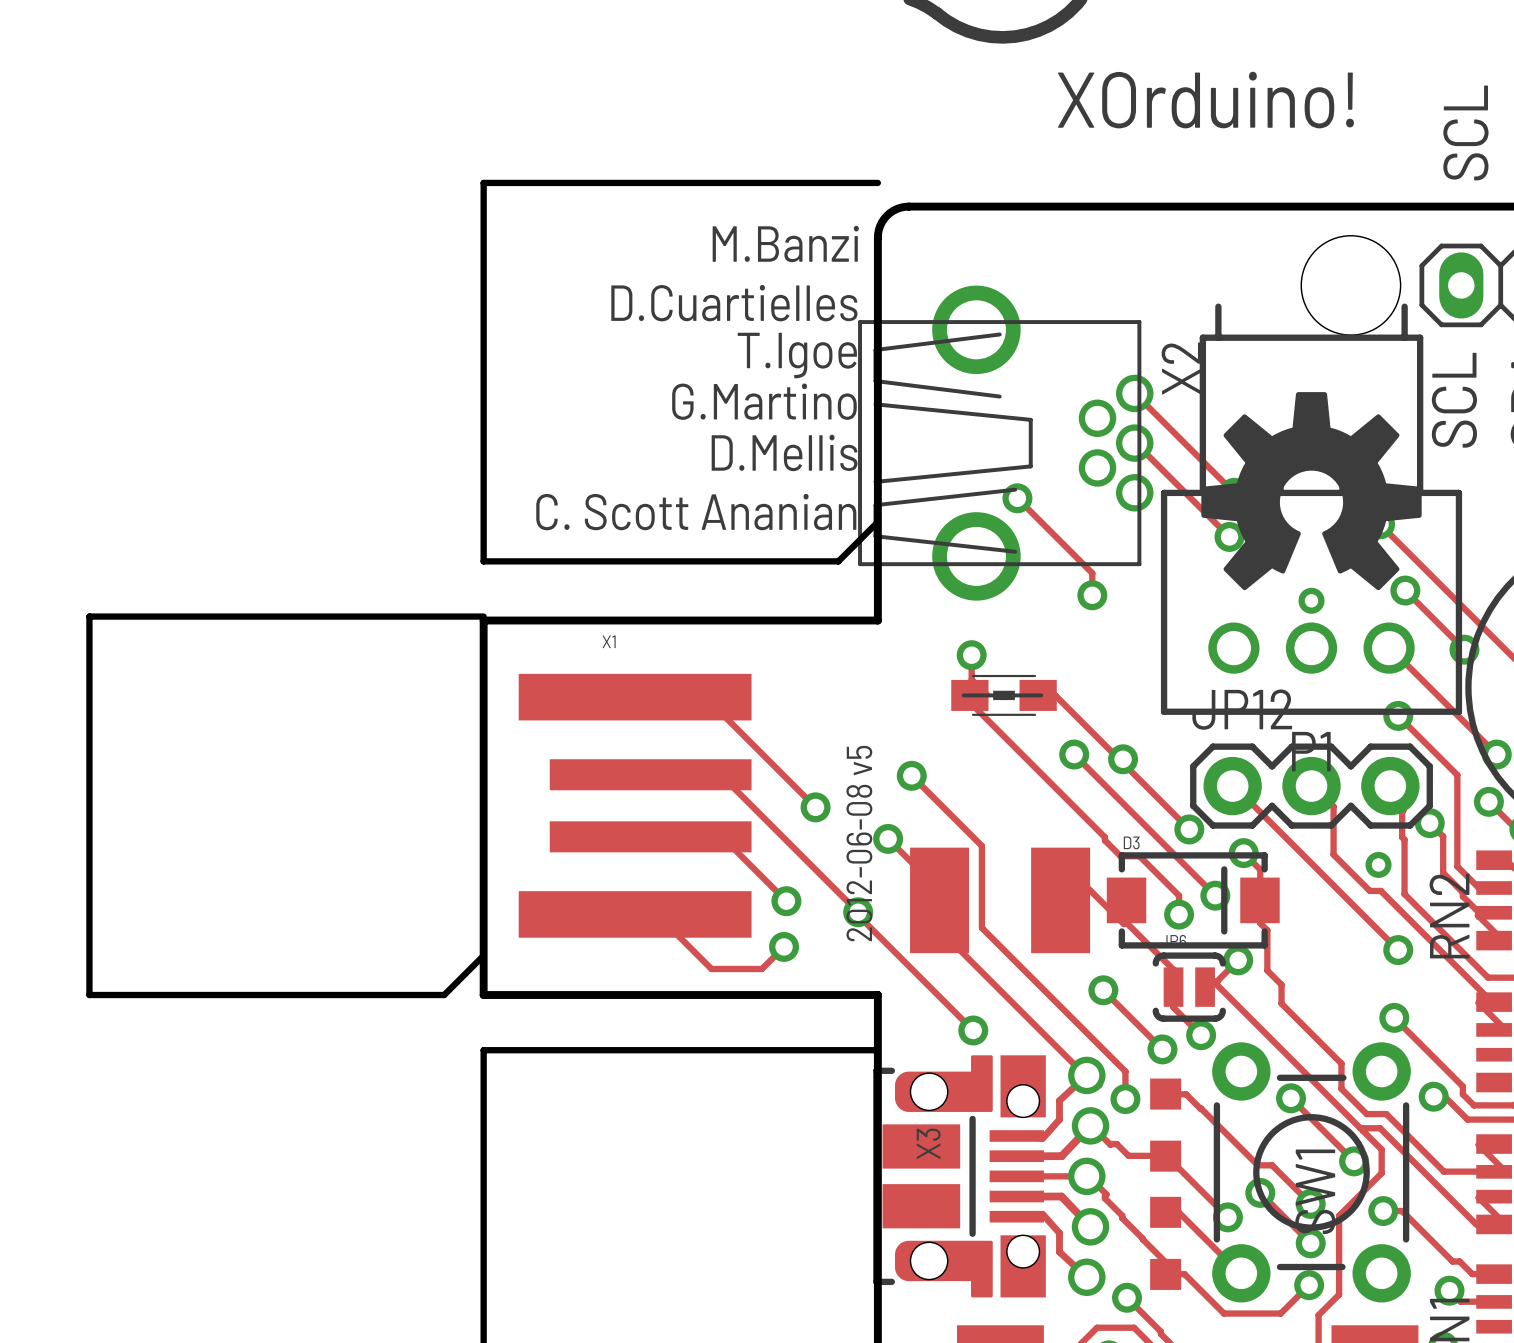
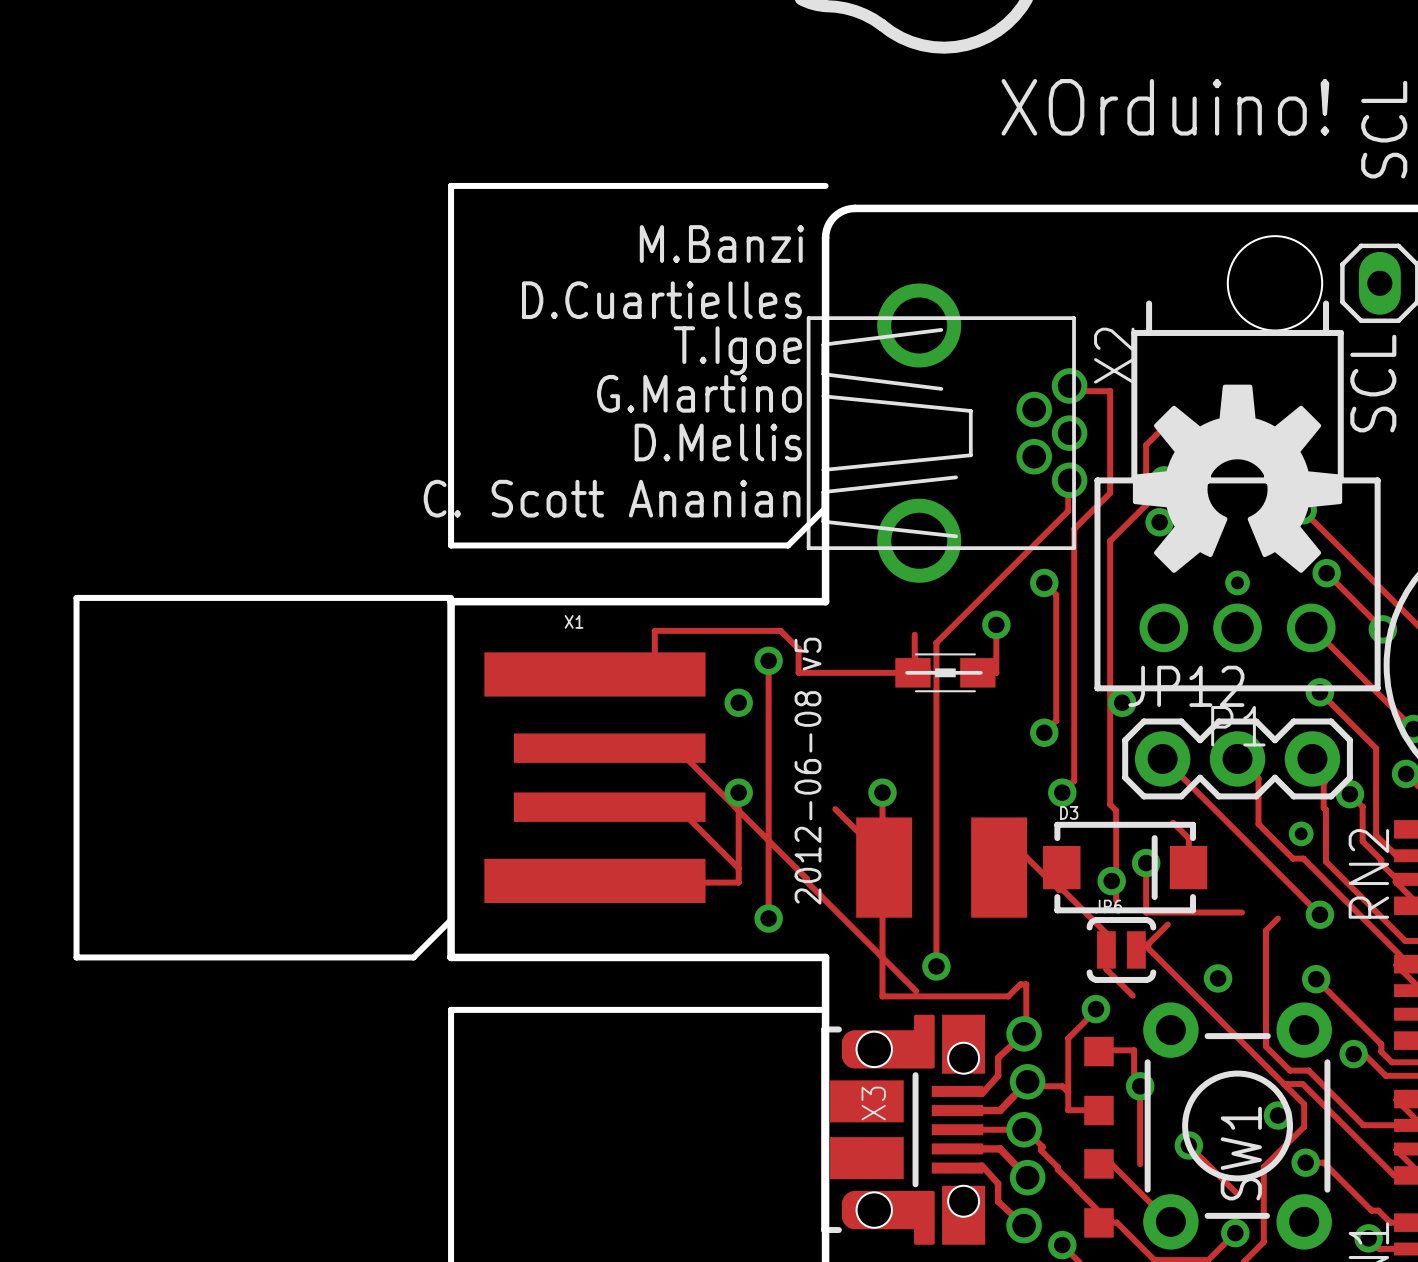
track: (1134, 393) (1234, 492) -> (1069, 385) (1074, 391) (1110, 391) (1110, 493) (1074, 529) (1074, 780) (1062, 792)
track: (1134, 443) (1229, 536) -> none
track: none -> (1158, 433) (1146, 445) (1146, 505) (1110, 540) (1110, 804) (1116, 810) (1116, 900)
track: none -> (1069, 480) (1068, 511) (936, 642) (936, 966)
track: (1017, 498) (1092, 573) (1092, 595) -> none
via: (1017, 498) -> none
via position: (1092, 595) -> (1044, 582)
track: none -> (1044, 582) (1056, 594) (1056, 720) (1044, 732)
via: none -> (996, 624)
via: (971, 655) -> none
track: none -> (768, 660) (768, 918)
via: none -> (768, 660)
track: (963, 695) (1104, 837) (1104, 840) (1120, 856) (1139, 856) (1179, 895) (1179, 914) -> none
track: (1055, 695) (1189, 829) -> (994, 672) (996, 672) (996, 624)
track: (635, 697) (705, 696) (815, 807) -> (594, 674) (648, 672) (654, 666) (654, 630) (780, 630) (798, 648) (798, 672) (907, 672)
via: none -> (738, 702)
via: none -> (1122, 702)
track: (1074, 754) (1215, 895) -> none
via: (1074, 754) -> none
via position: (1123, 759) -> (1044, 732)
track: (911, 775) (981, 846) (981, 928) (1125, 1071) (1125, 1099) -> none
via: (911, 775) -> none
via position: (815, 807) -> (738, 792)
via: none -> (882, 792)
via: none -> (1062, 792)
via: (1189, 829) -> none
via: (888, 838) -> none
via: (1243, 853) -> none
track: (939, 900) (939, 929) (1082, 1072) (1088, 1071) (1099, 1084) (1086, 1075) -> (882, 792) (882, 864) (884, 867) (882, 870) (882, 996) (1008, 996) (1020, 984) (1026, 984) (1026, 1032) (1024, 1033)
track: (1259, 900) (1260, 923) (1267, 930) (1267, 970) (1281, 984) (1281, 1003) (1341, 1063) -> (1277, 918) (1266, 930) (1266, 1022)
via: (786, 901) -> none
track: none -> (1146, 870) (1146, 912) (1242, 912)
via: (858, 912) -> none
track: (635, 914) (657, 914) (711, 968) (761, 968) (784, 946) -> (594, 880) (600, 882) (738, 882) (738, 792)
via: (784, 946) -> none
via: none -> (768, 918)
via: (1238, 960) -> none
track: (1103, 990) (1162, 1049) -> none
via: (1103, 990) -> none
via: none -> (1218, 978)
via position: (973, 1030) -> (936, 966)
via: (1201, 1035) -> none
track: none -> (1098, 1008) (1068, 1038) (1068, 1110)
track: (1165, 1093) (1186, 1094) (1257, 1165) (1272, 1165) (1310, 1203) -> (1098, 1051) (1134, 1050) (1134, 1080) (1140, 1086) (1140, 1164)
track: (1291, 1098) (1354, 1161) -> none
via: (1291, 1098) -> none
via: (1125, 1099) -> none
track: (1090, 1125) (1110, 1144) (1116, 1144) (1128, 1155) (1133, 1155) -> (1027, 1081) (1032, 1086) (1062, 1086) (1068, 1092)
via: none -> (1140, 1086)
track: (1165, 1156) (1227, 1217) -> none
via: (1310, 1203) -> none
via: (1227, 1217) -> none
via: (1310, 1243) -> none

